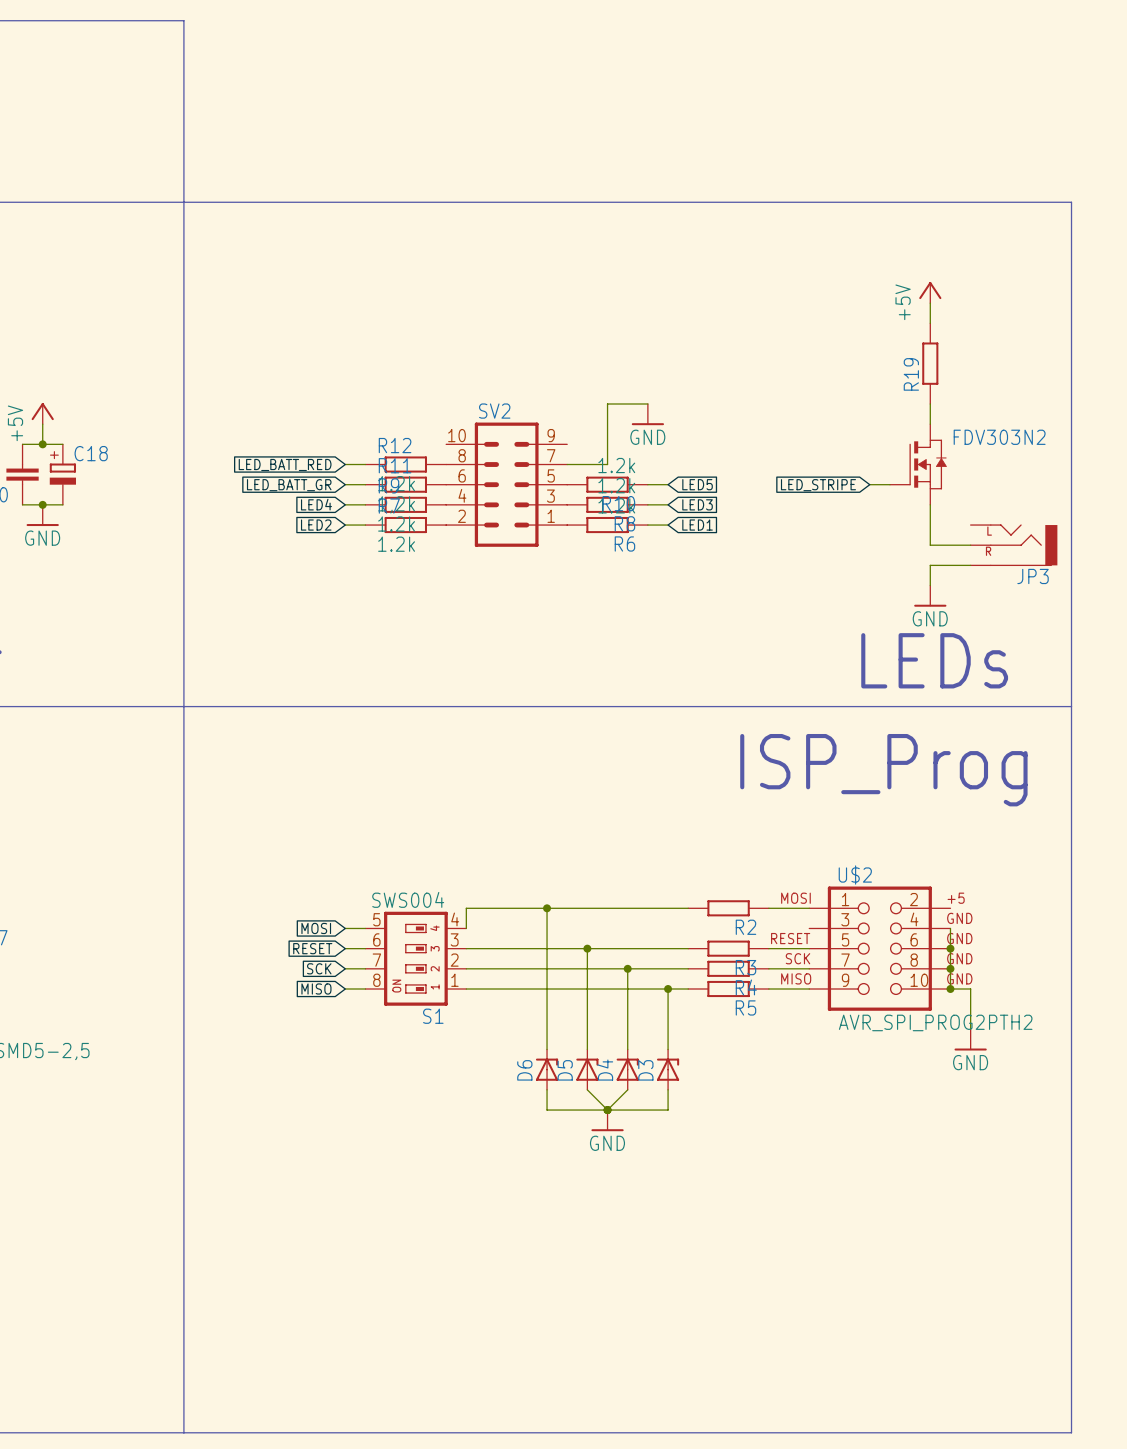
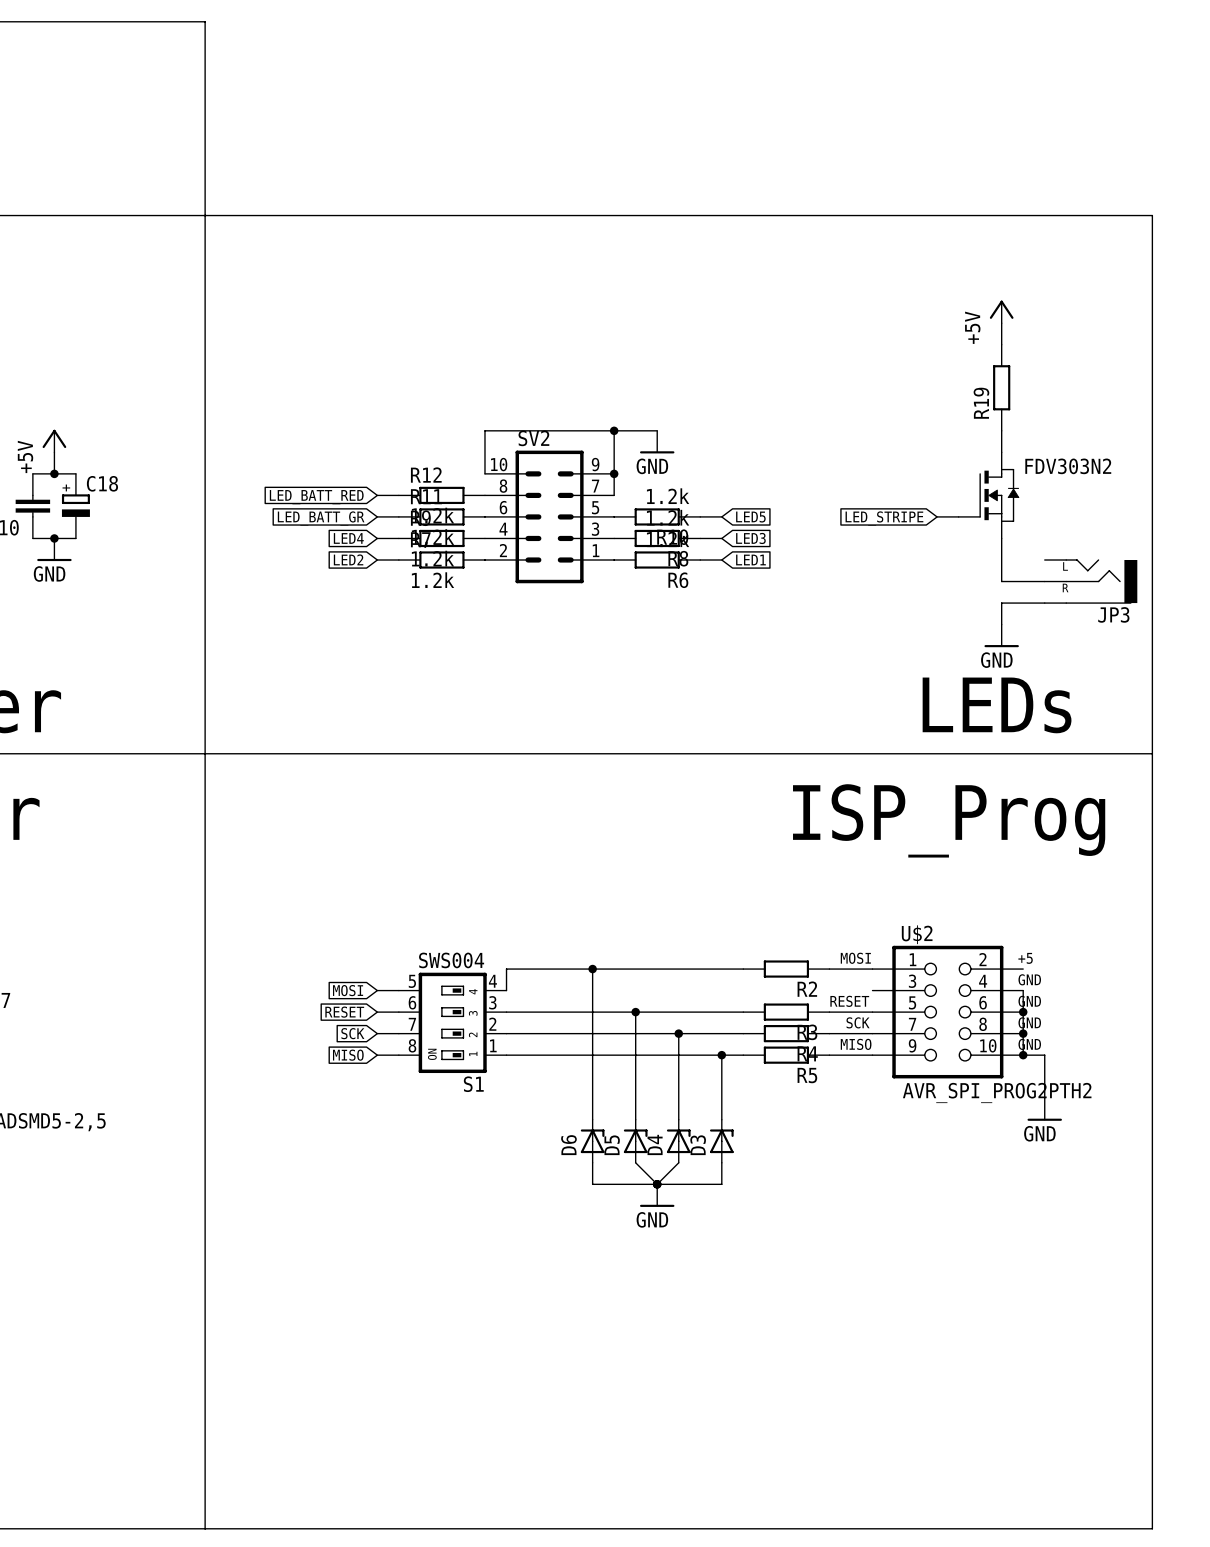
junction: none -> (614, 430)
wire: none -> (657, 430) (484, 430) (484, 473)
wire: (647, 403) (607, 403) (607, 464) (567, 464) -> (614, 430) (614, 495)
power symbol position: GND (647, 414) -> GND (657, 442)
junction: none -> (614, 473)

